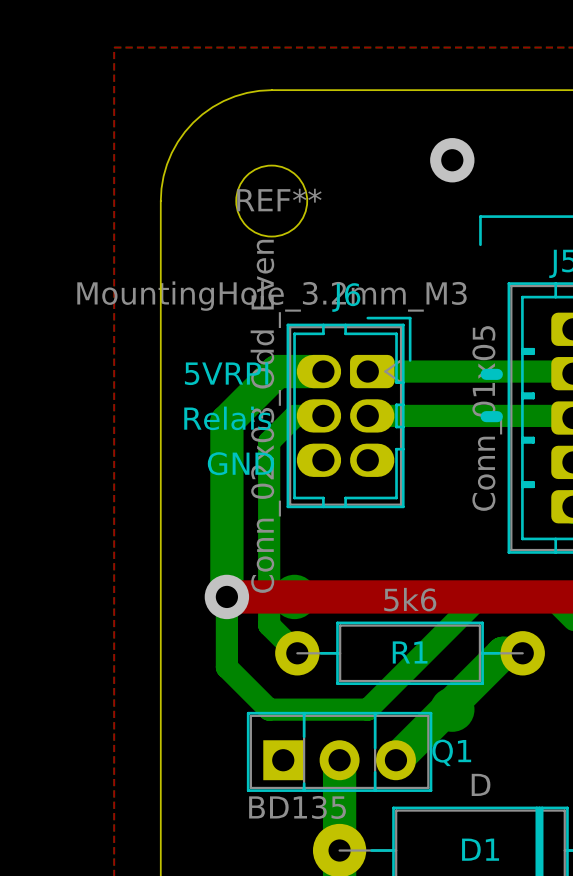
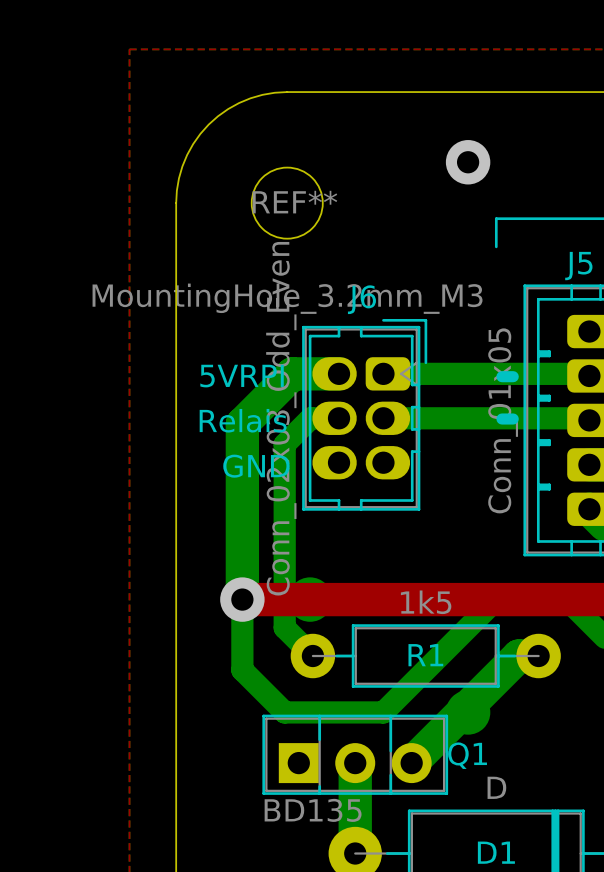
R1 value: 5k6 (410, 599) -> 1k5 (426, 602)

